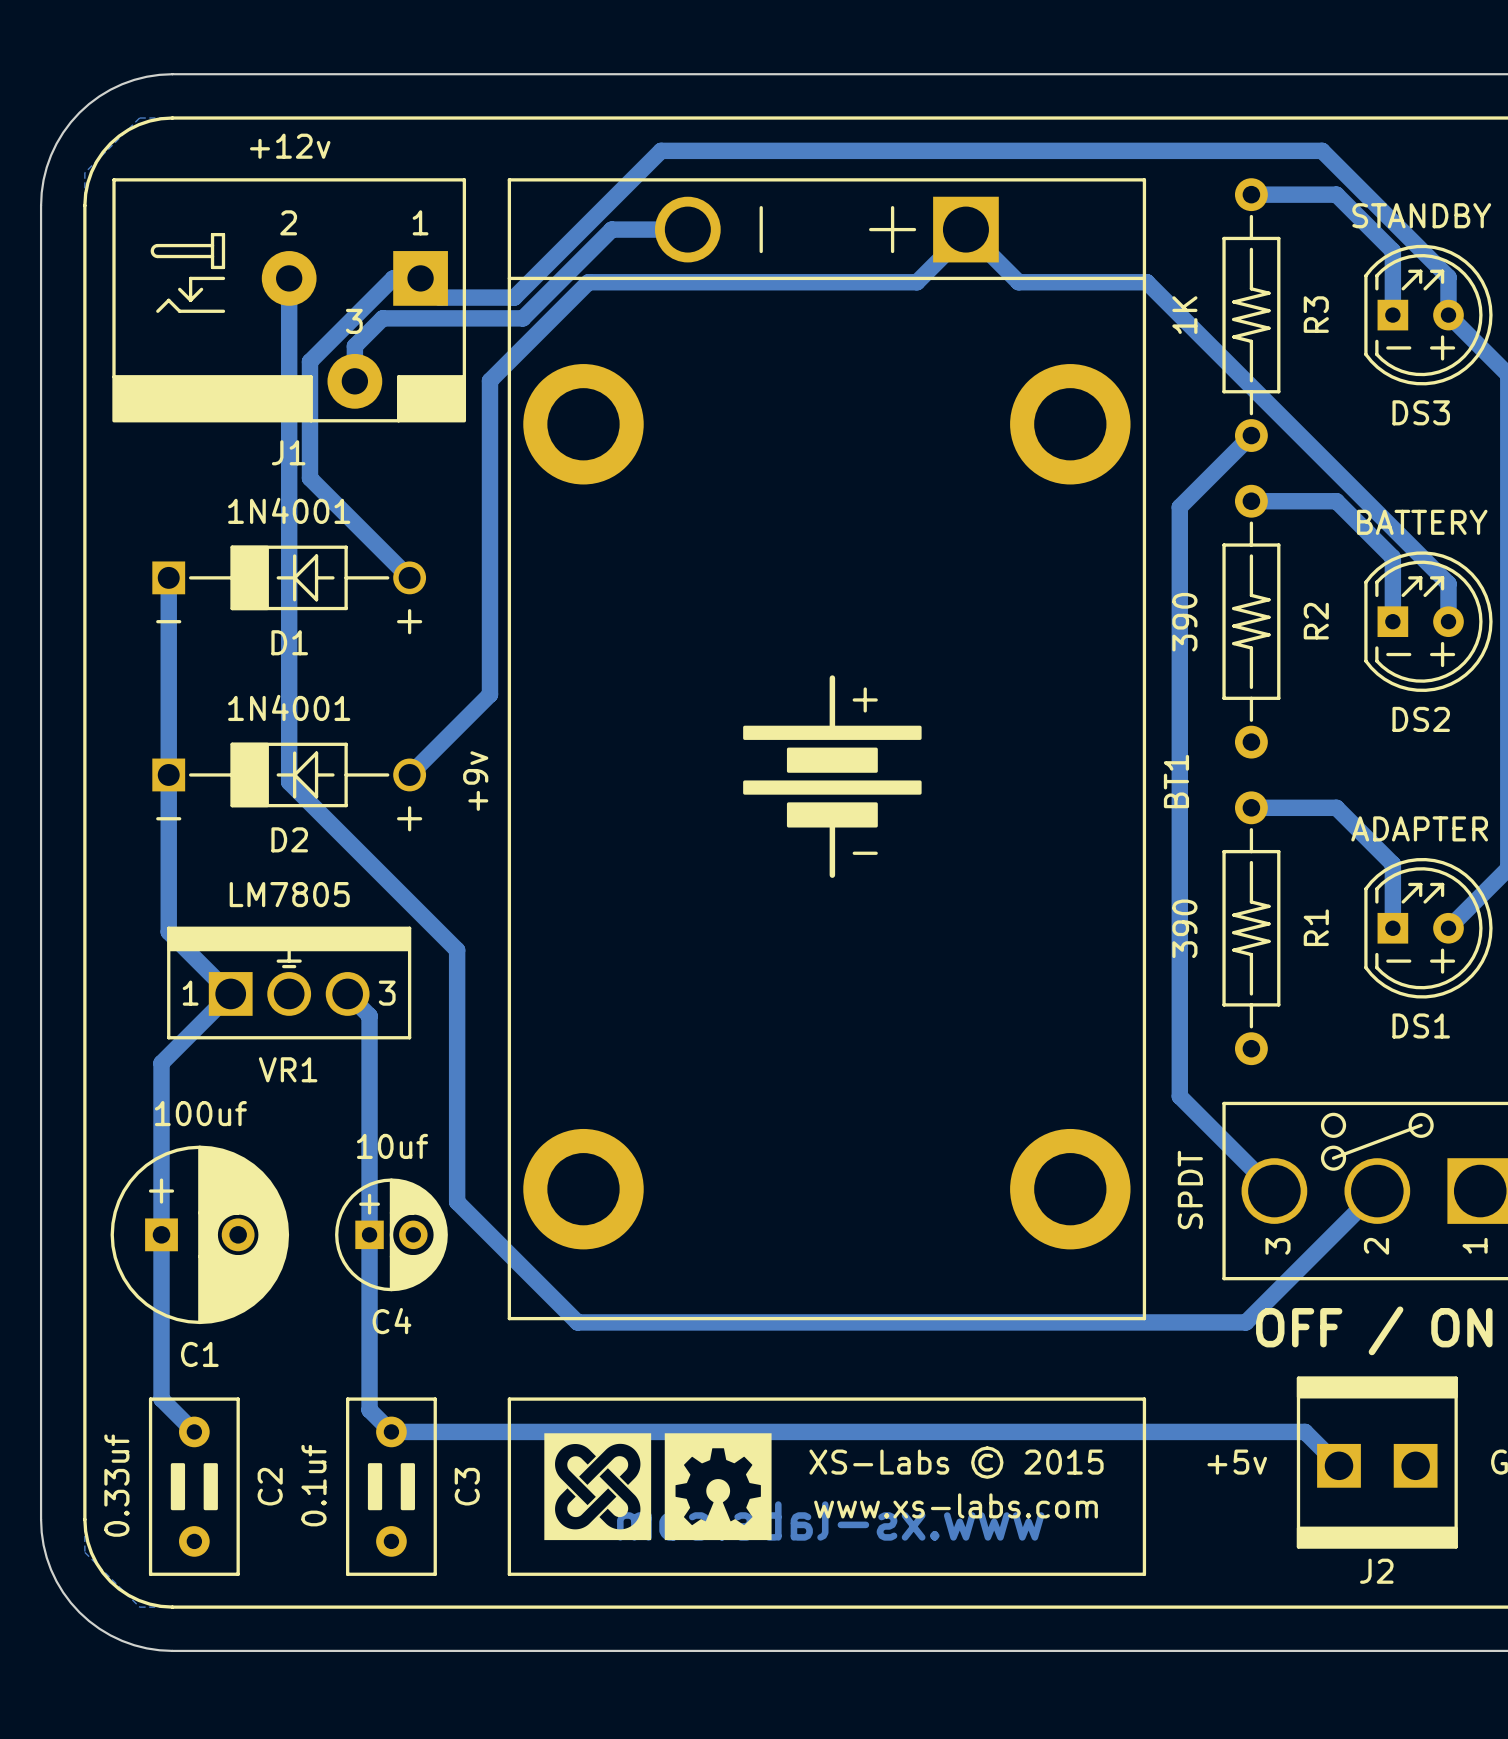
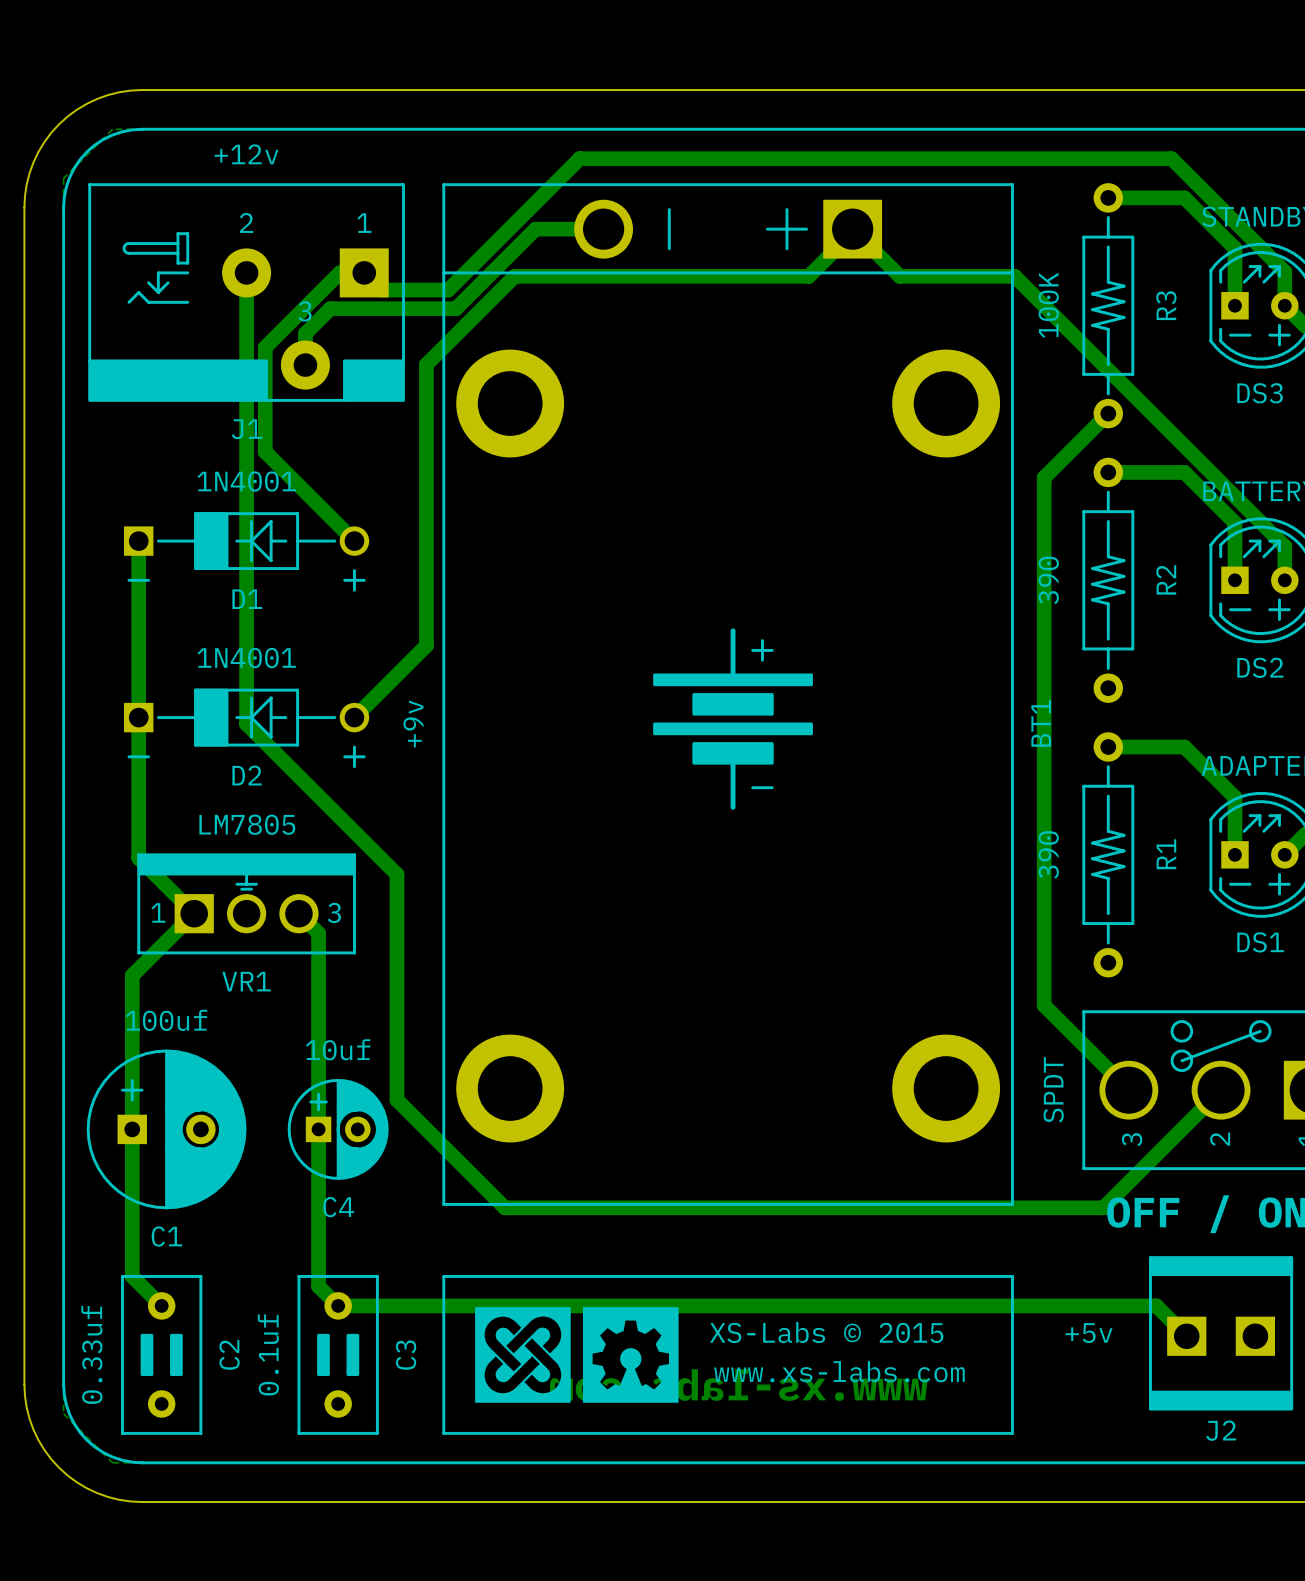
R3 value: 1K (1184, 315) -> 100K (1048, 305)

